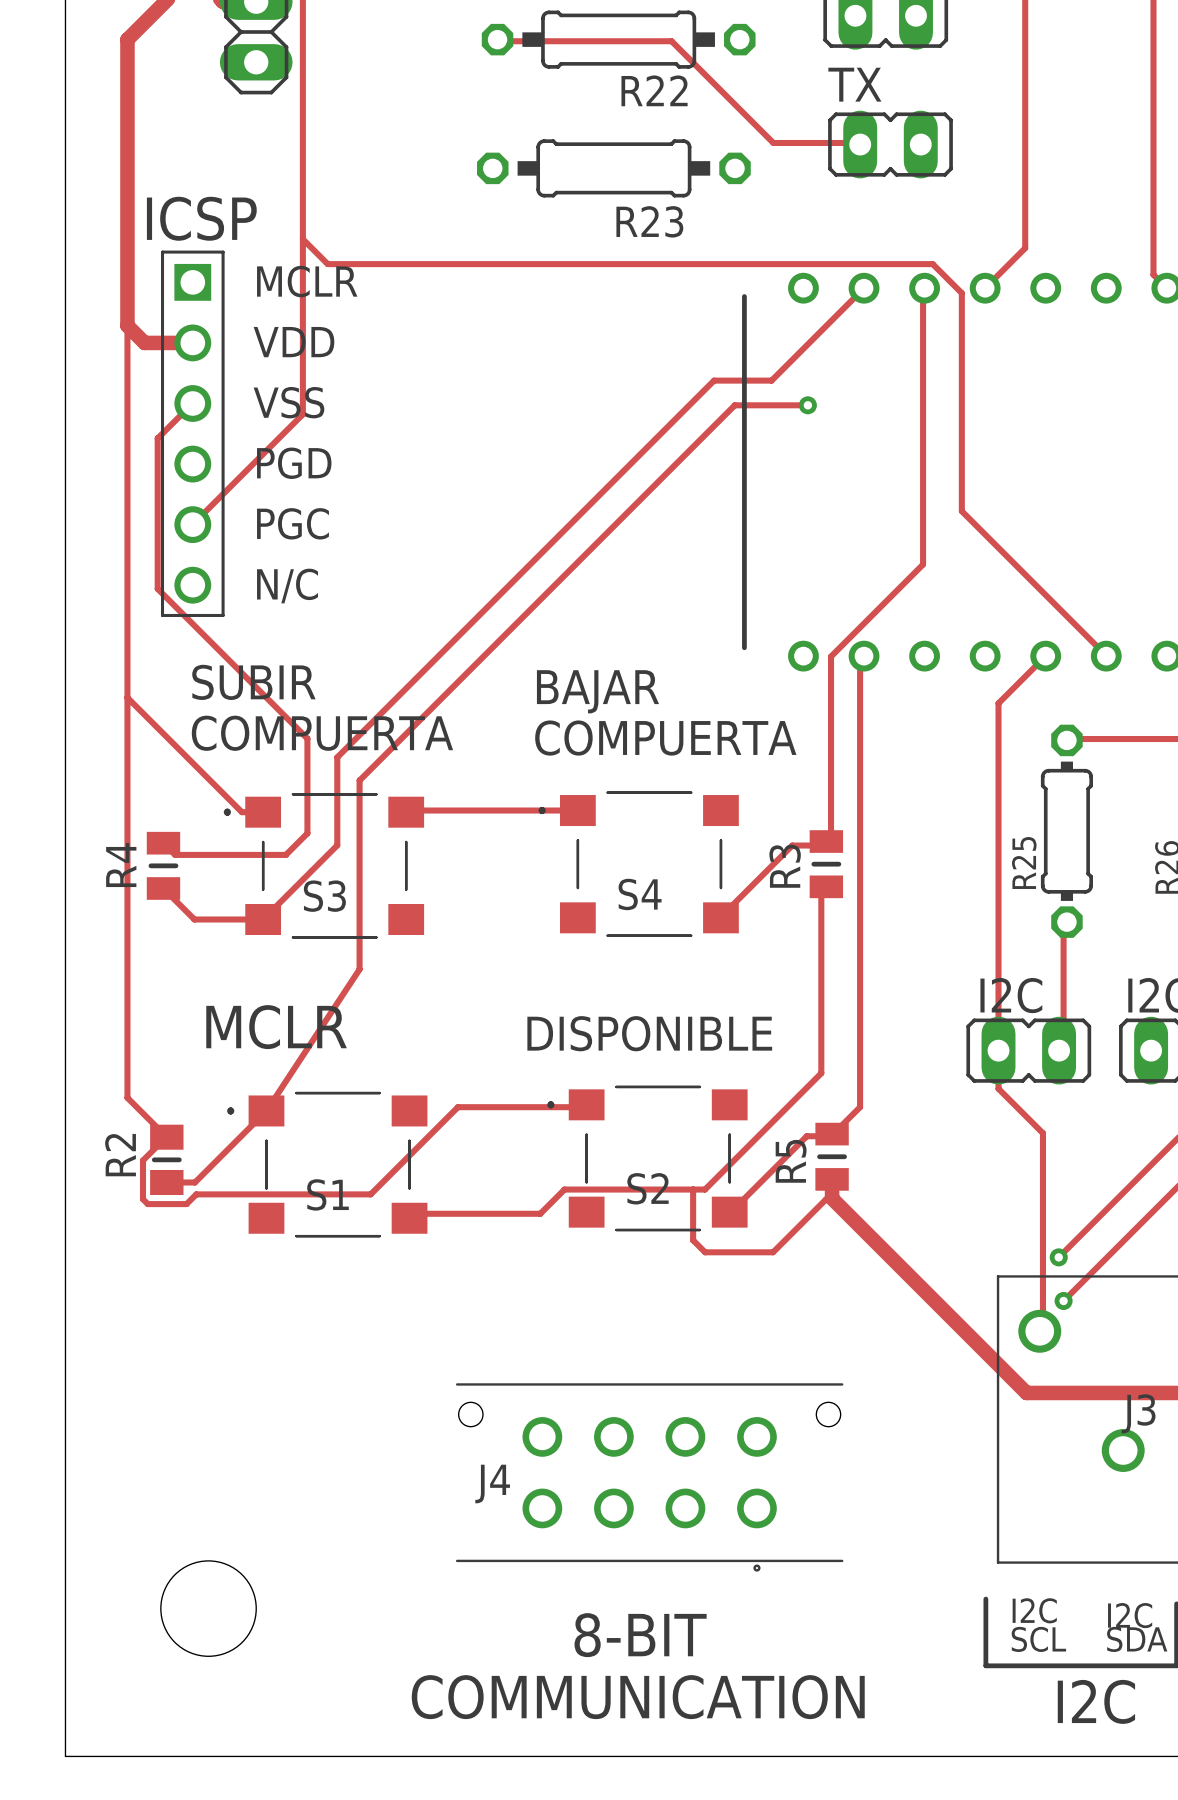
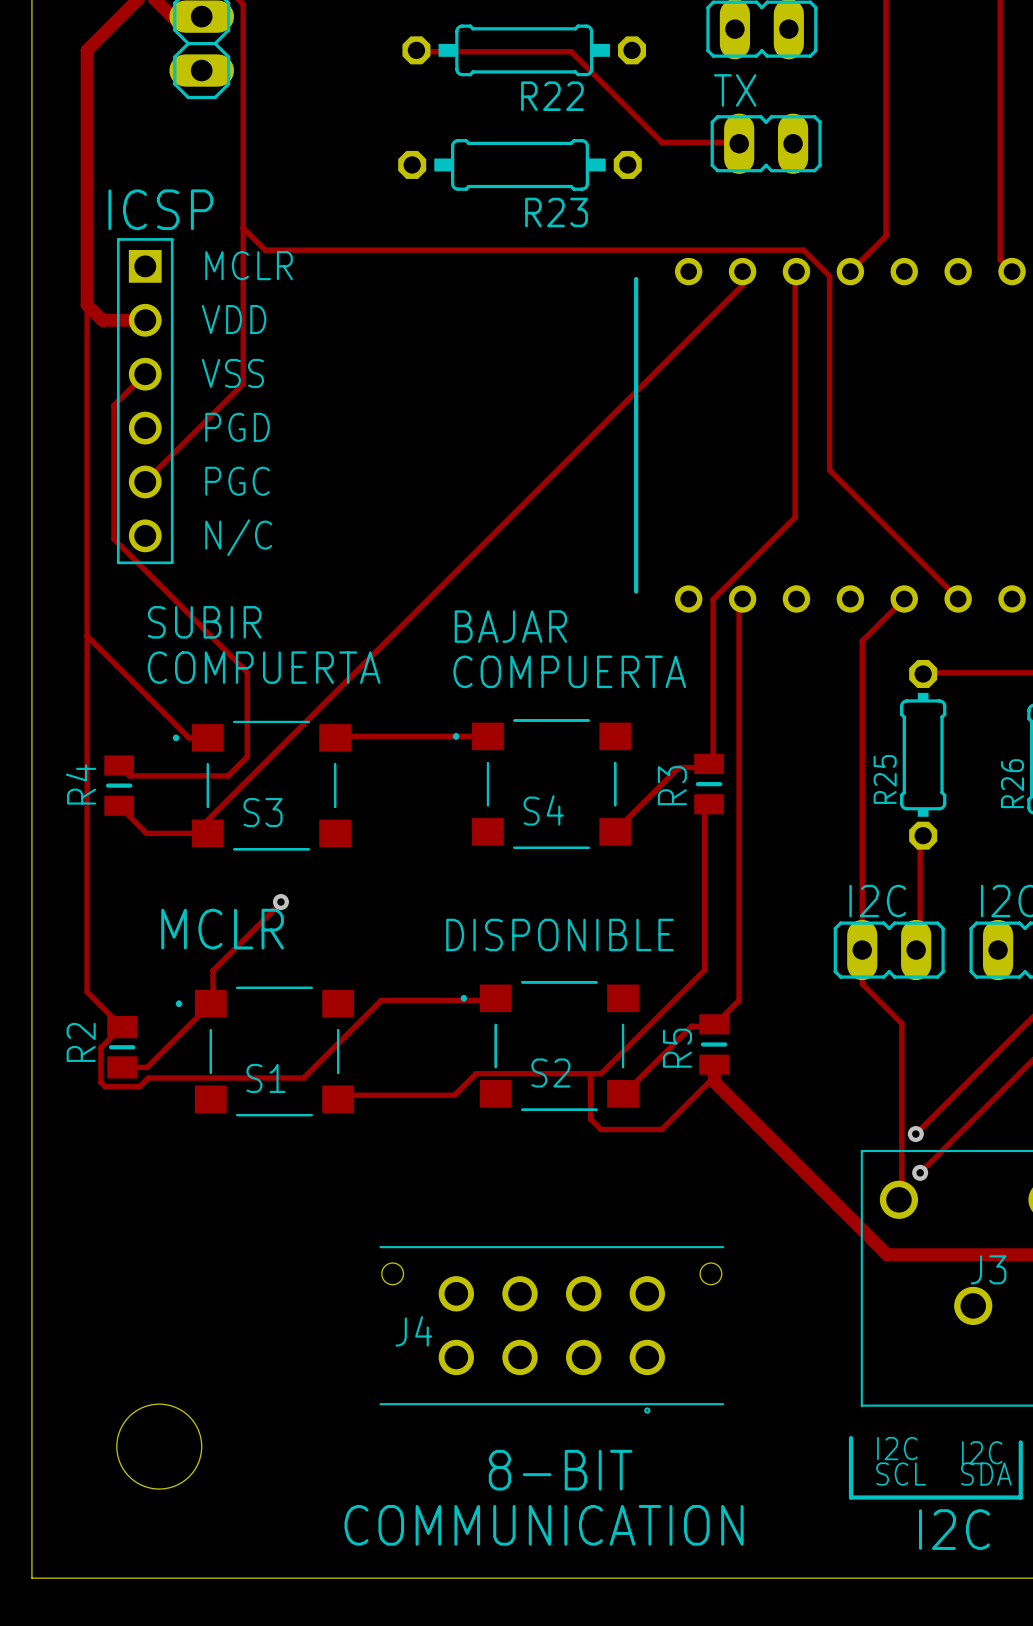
track: (864, 288) (771, 380) (714, 380) (337, 757) (337, 845) (263, 919) -> (742, 271) (742, 285) (201, 826)
track: (807, 405) (734, 405) (359, 780) (359, 969) (268, 1107) -> (280, 902) (213, 970) (213, 1000)
via: (807, 405) -> none
via: none -> (280, 902)

